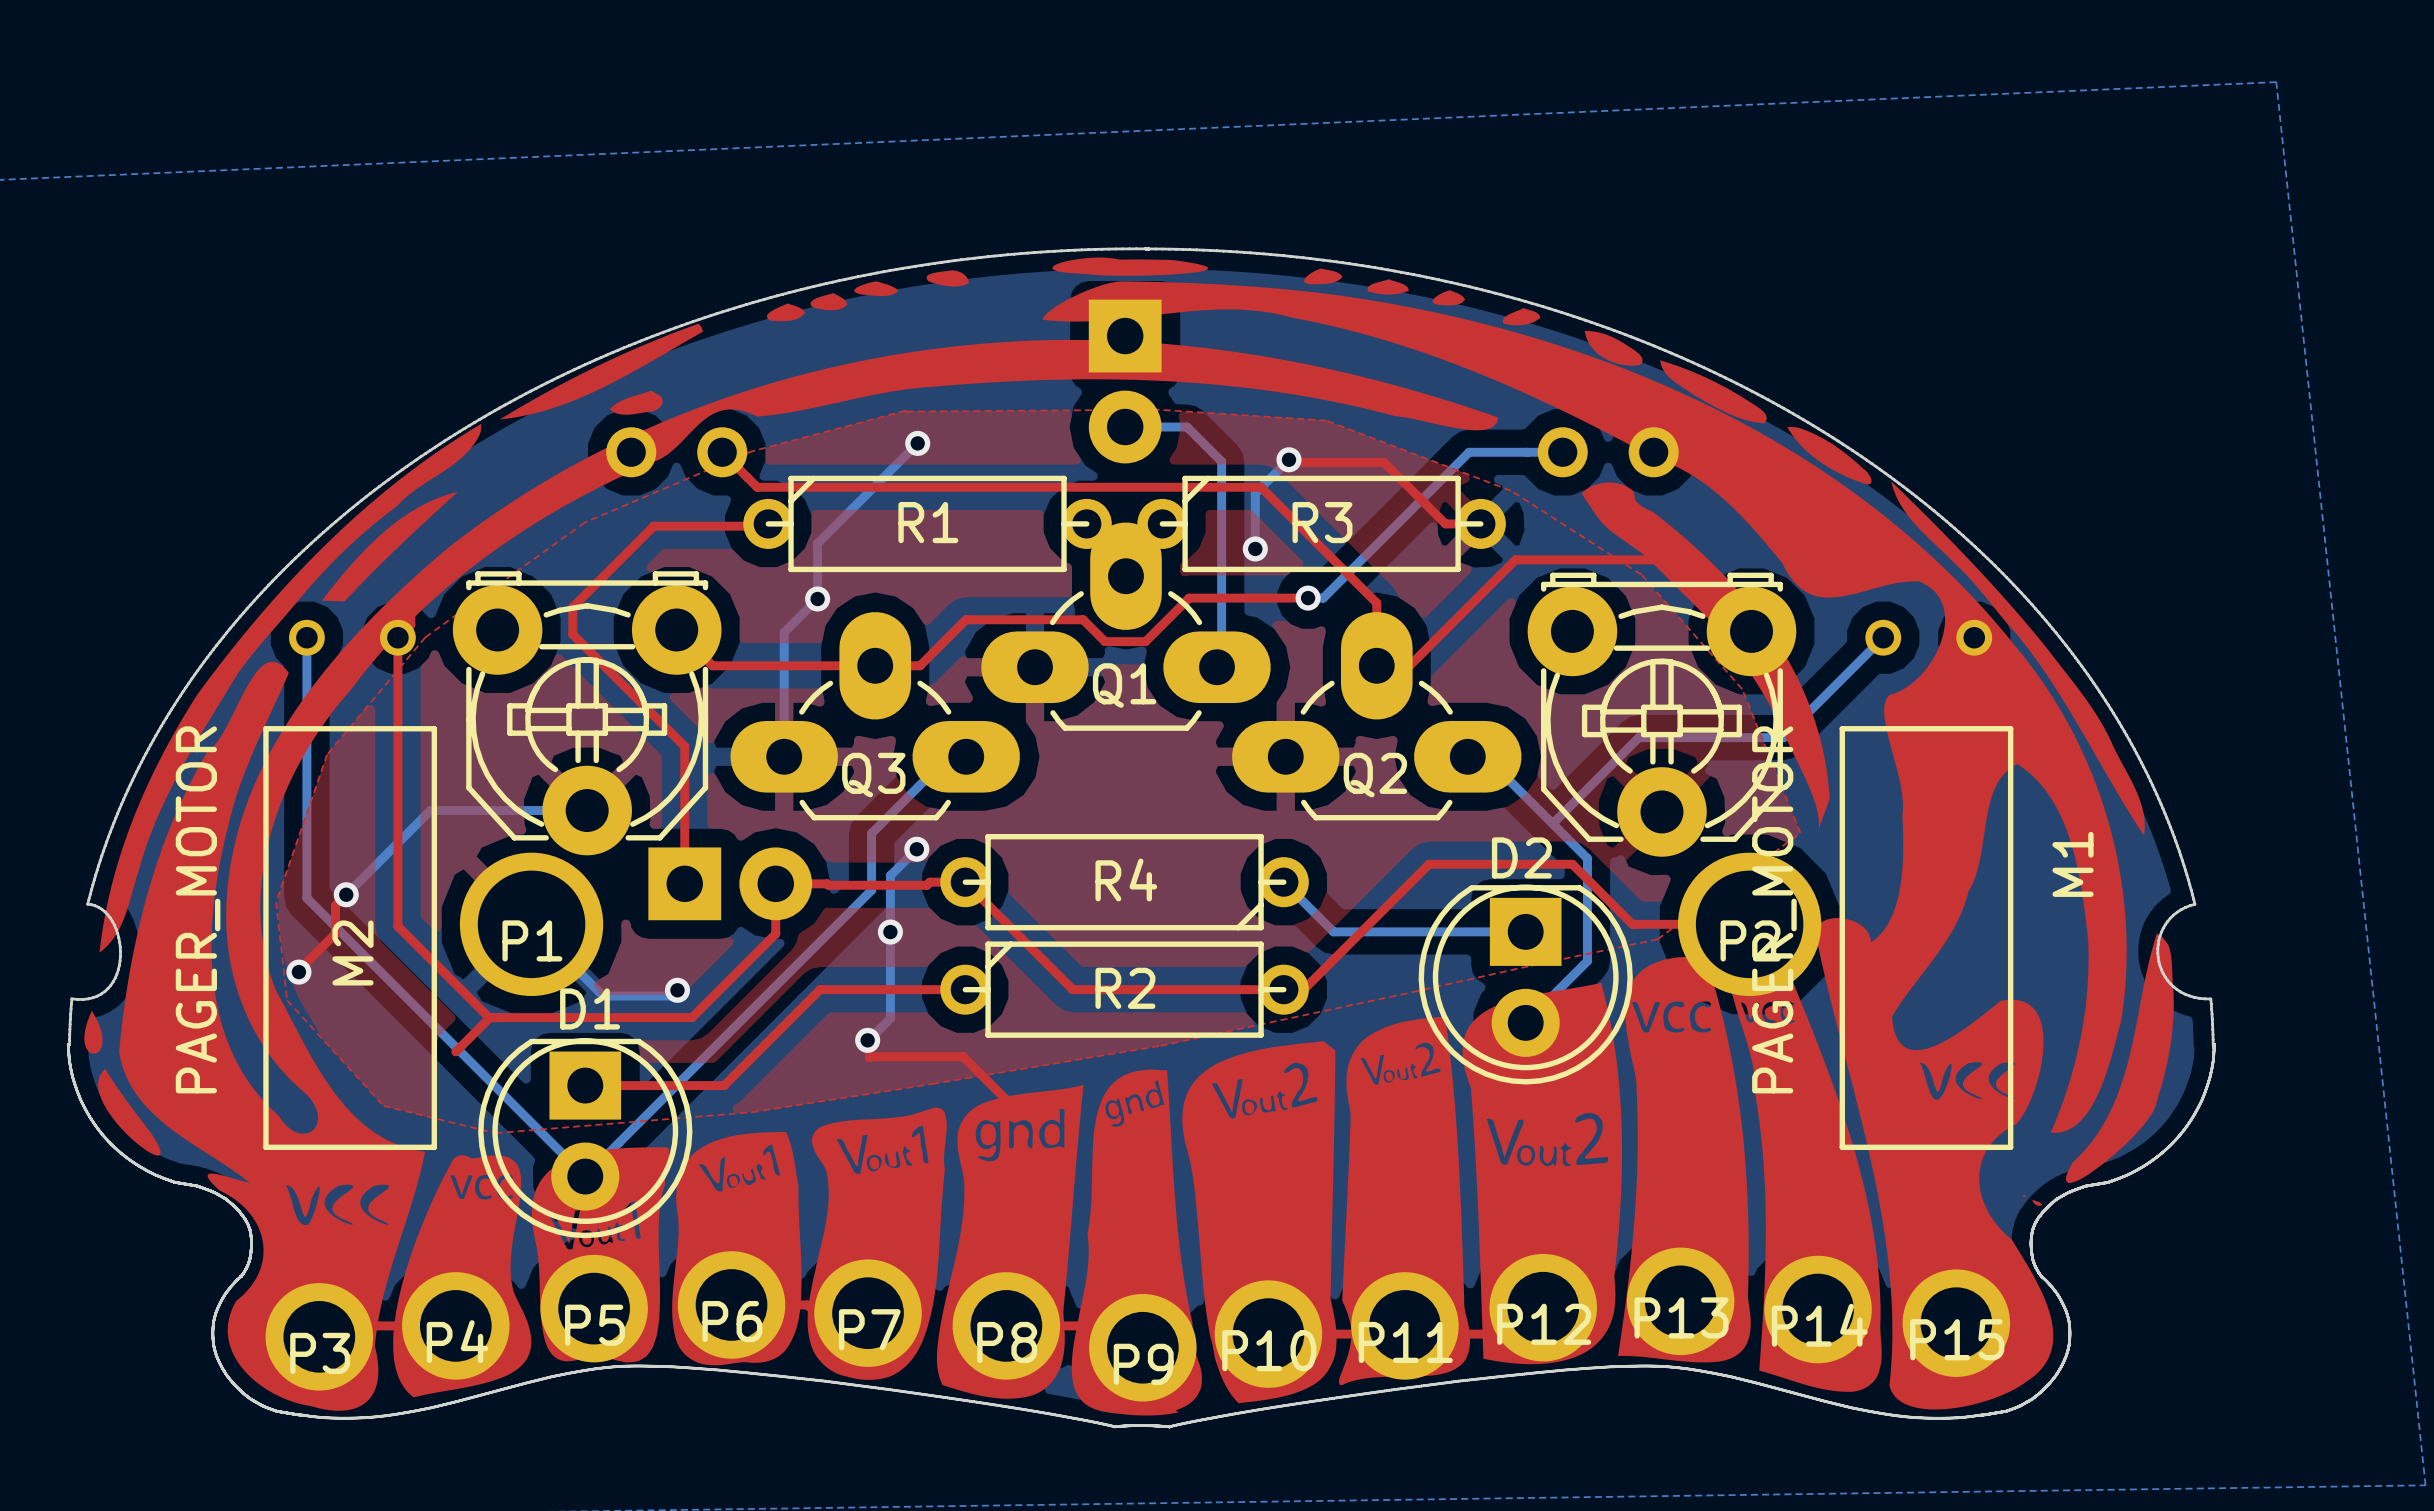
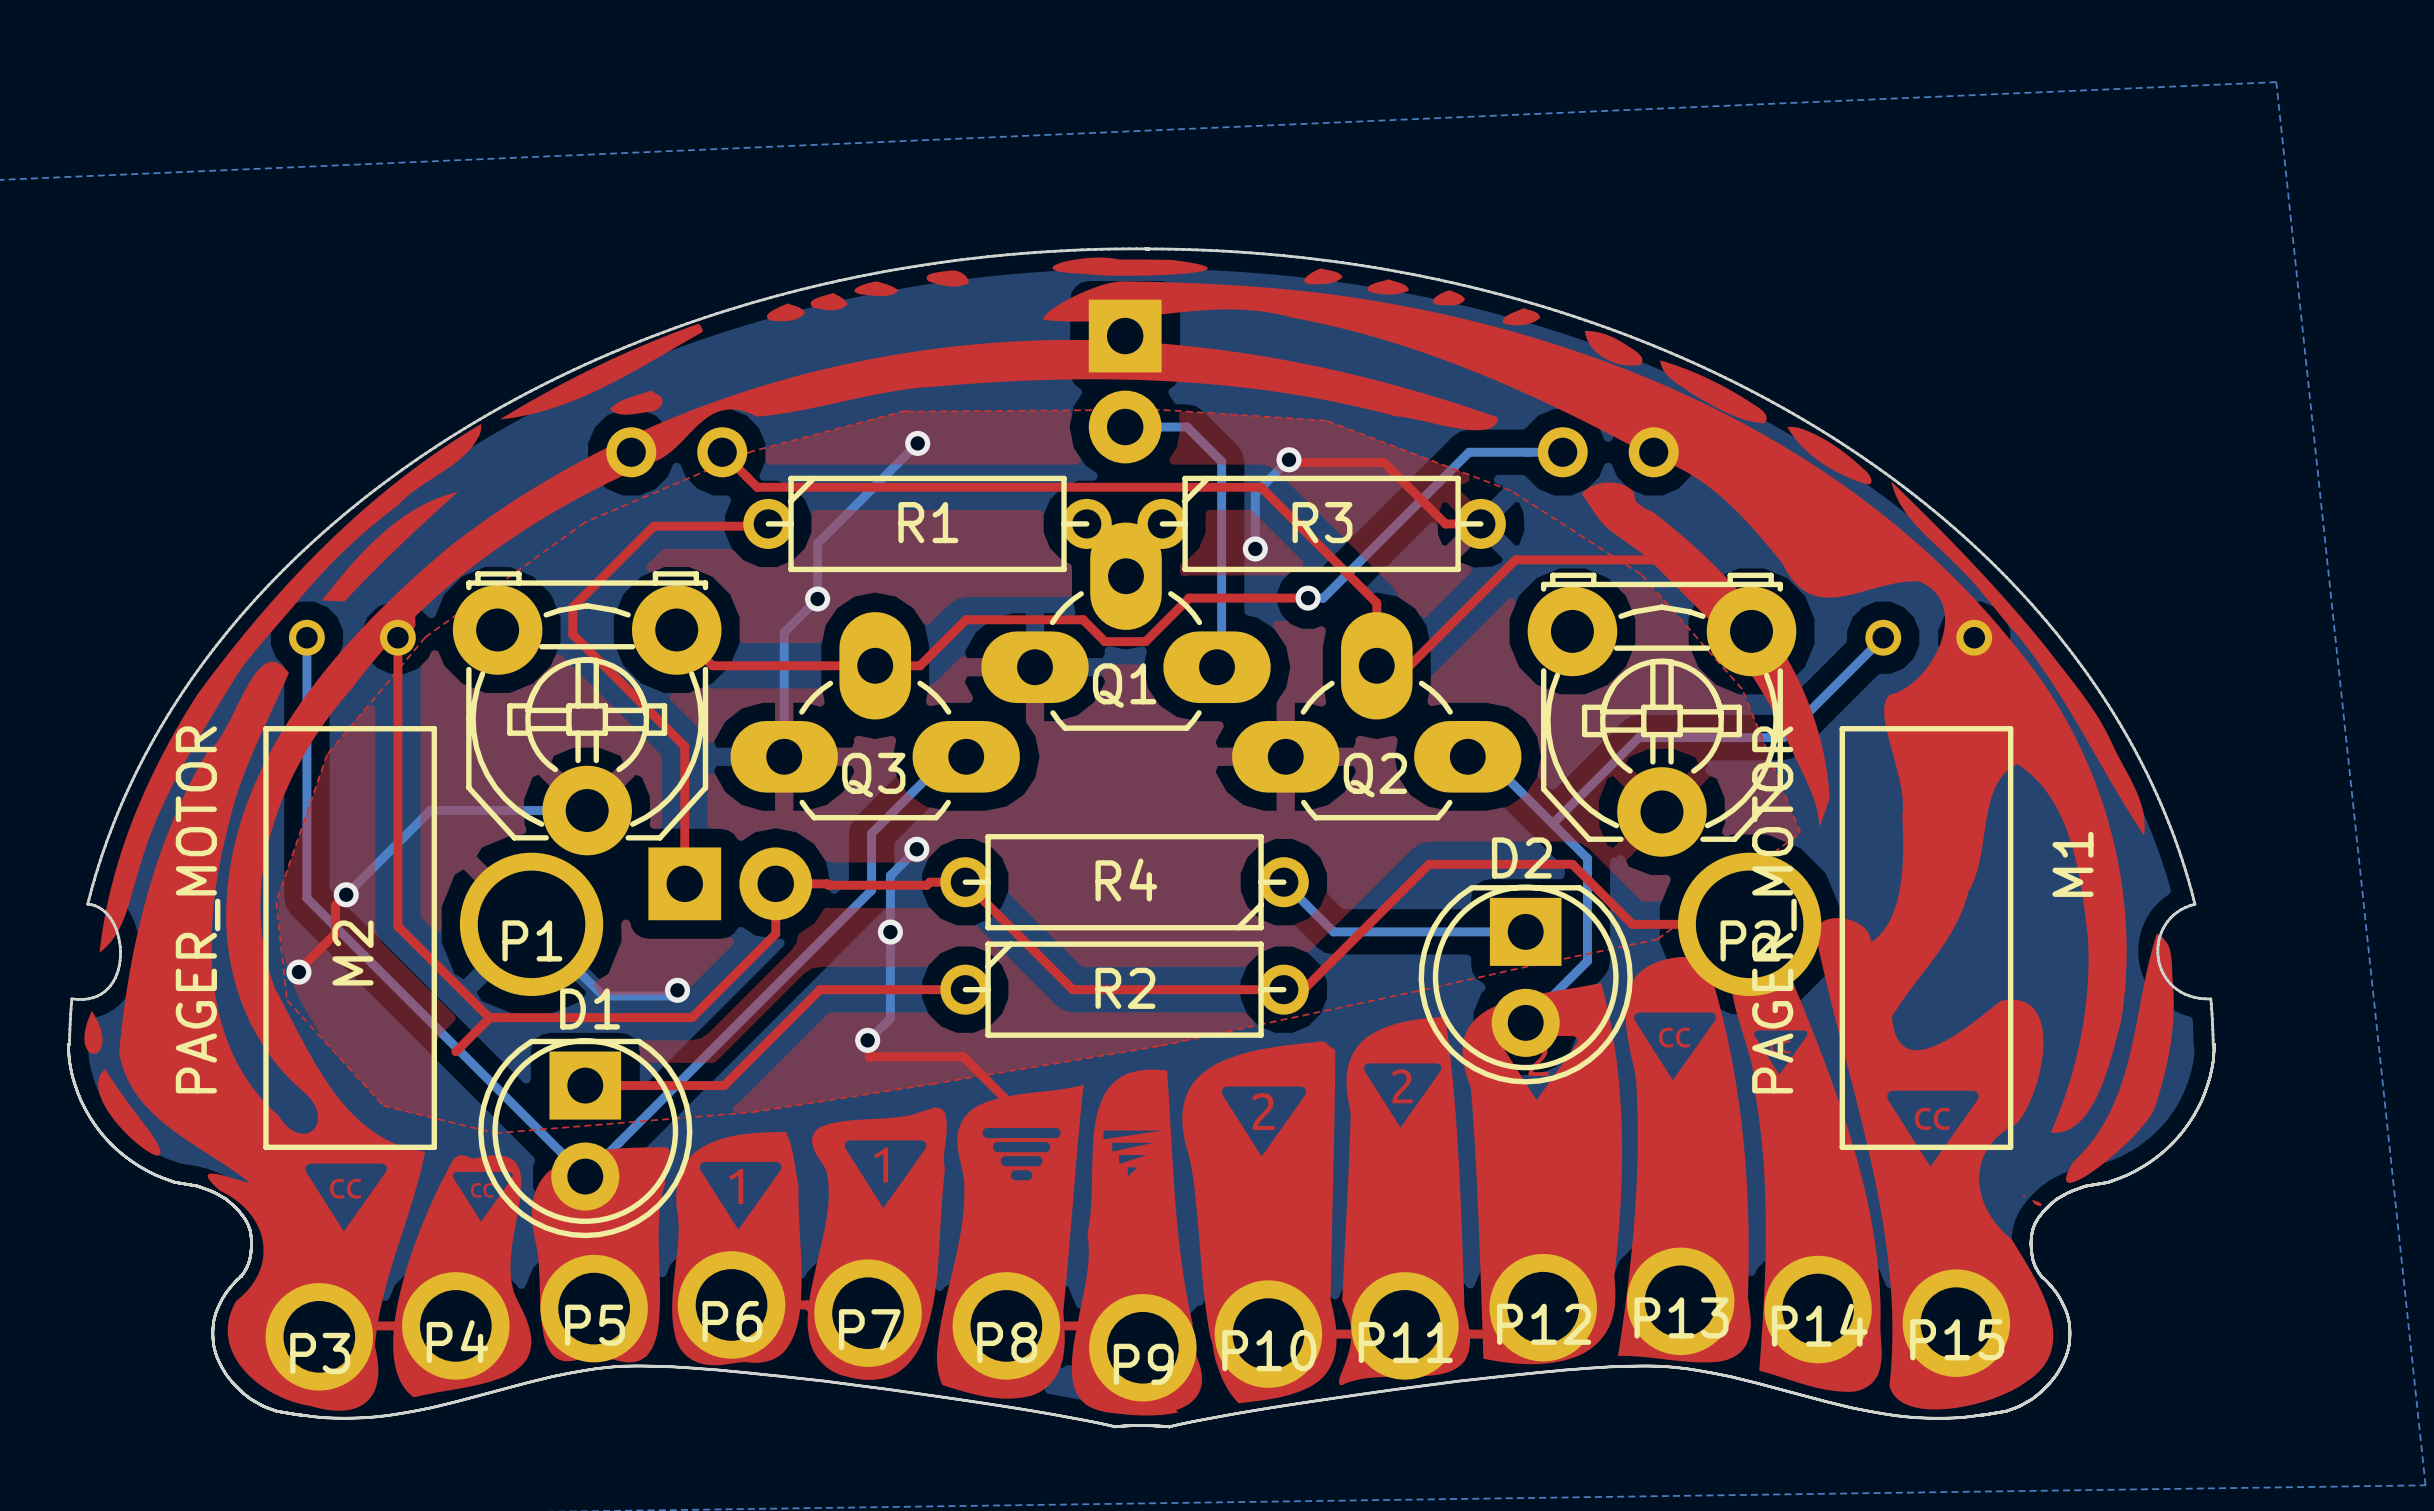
drawing shape: [66, 247, 2216, 1429] -> [66, 247, 2216, 1429]

